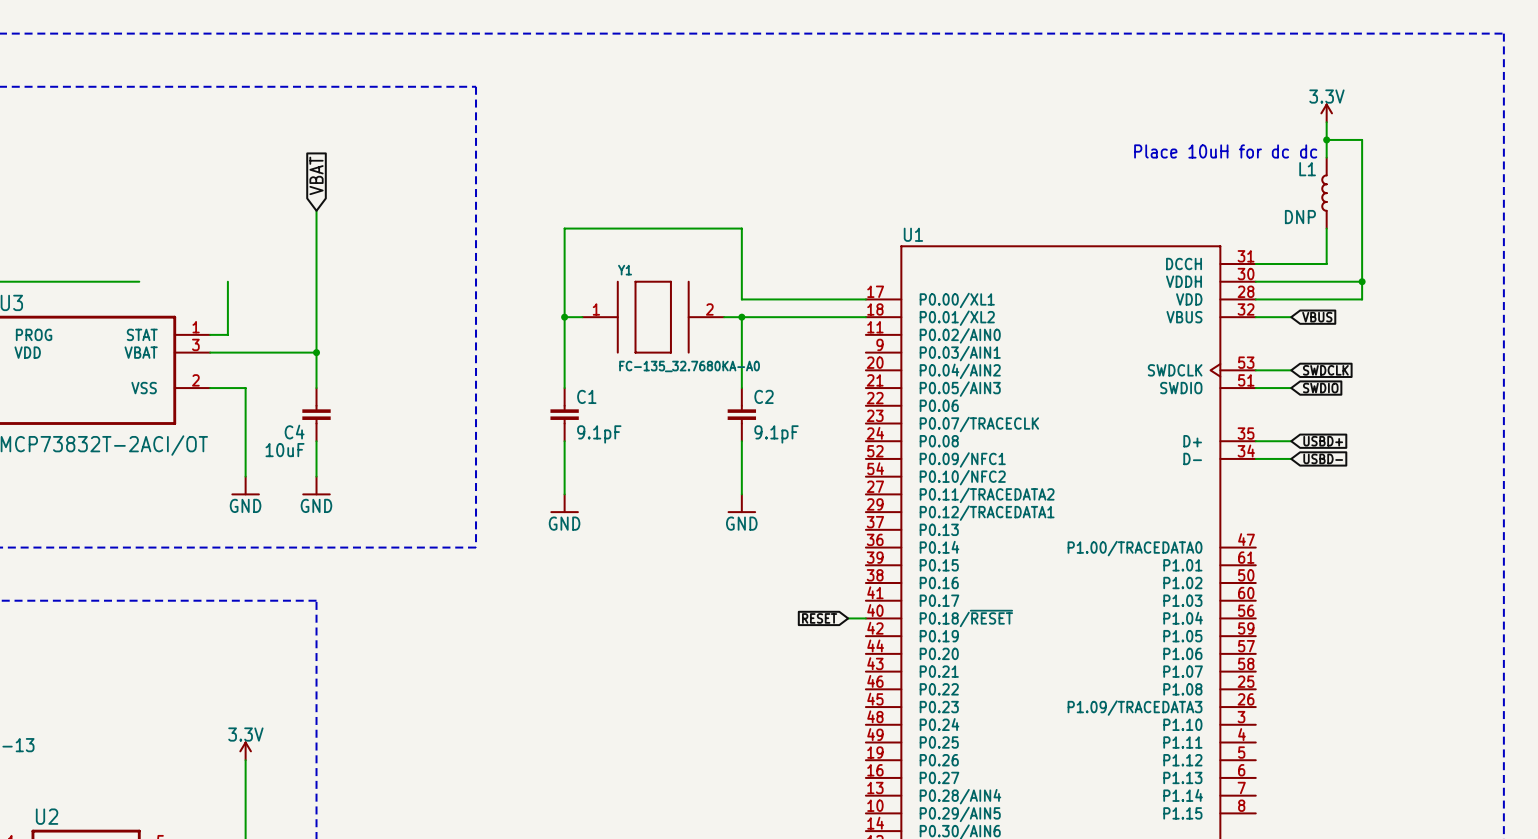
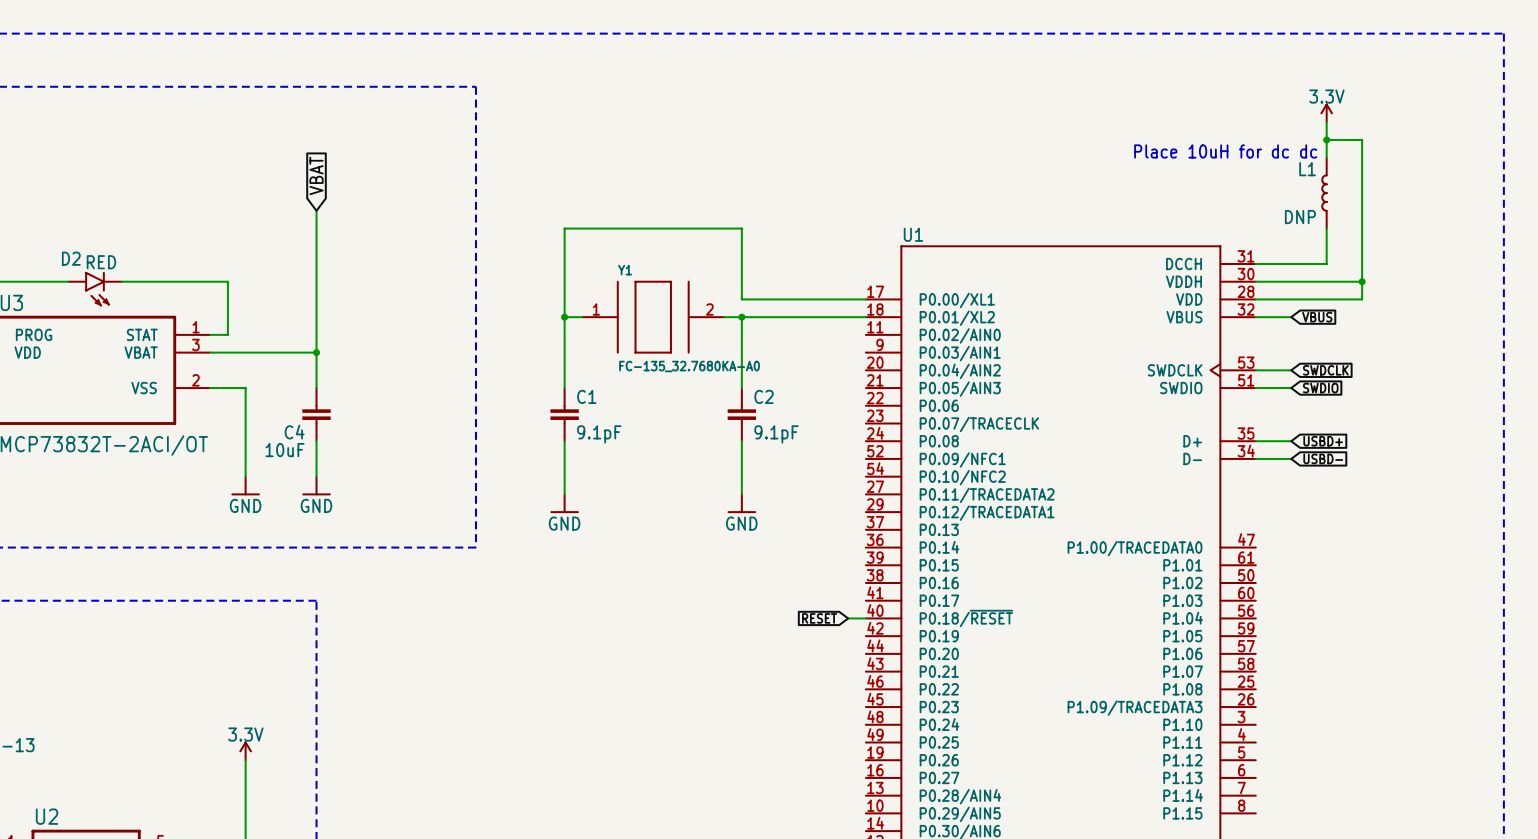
wire: none -> (139, 281) (227, 281)
D2: none -> RED (94, 289)

